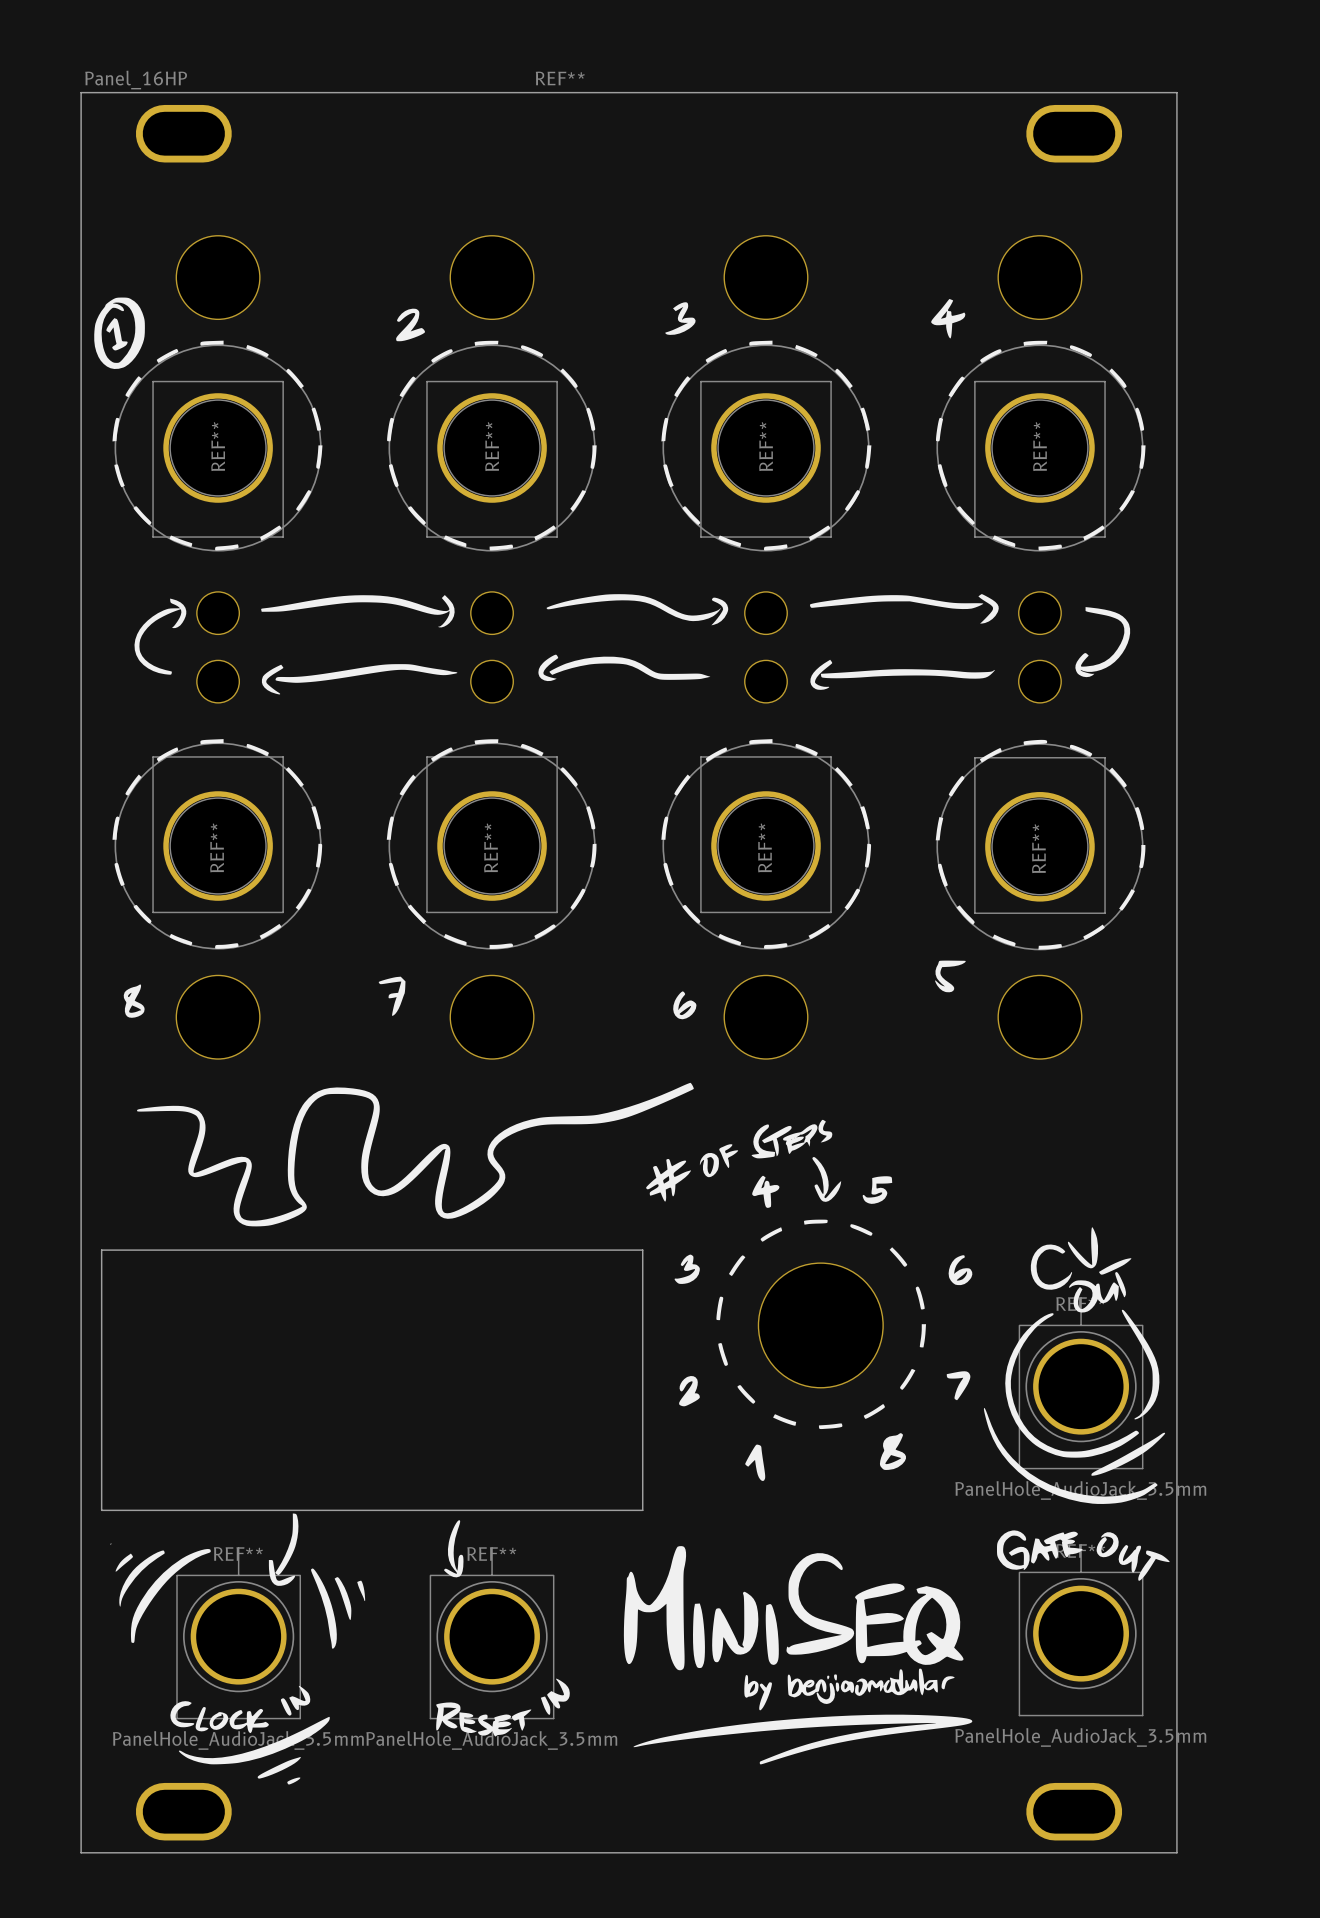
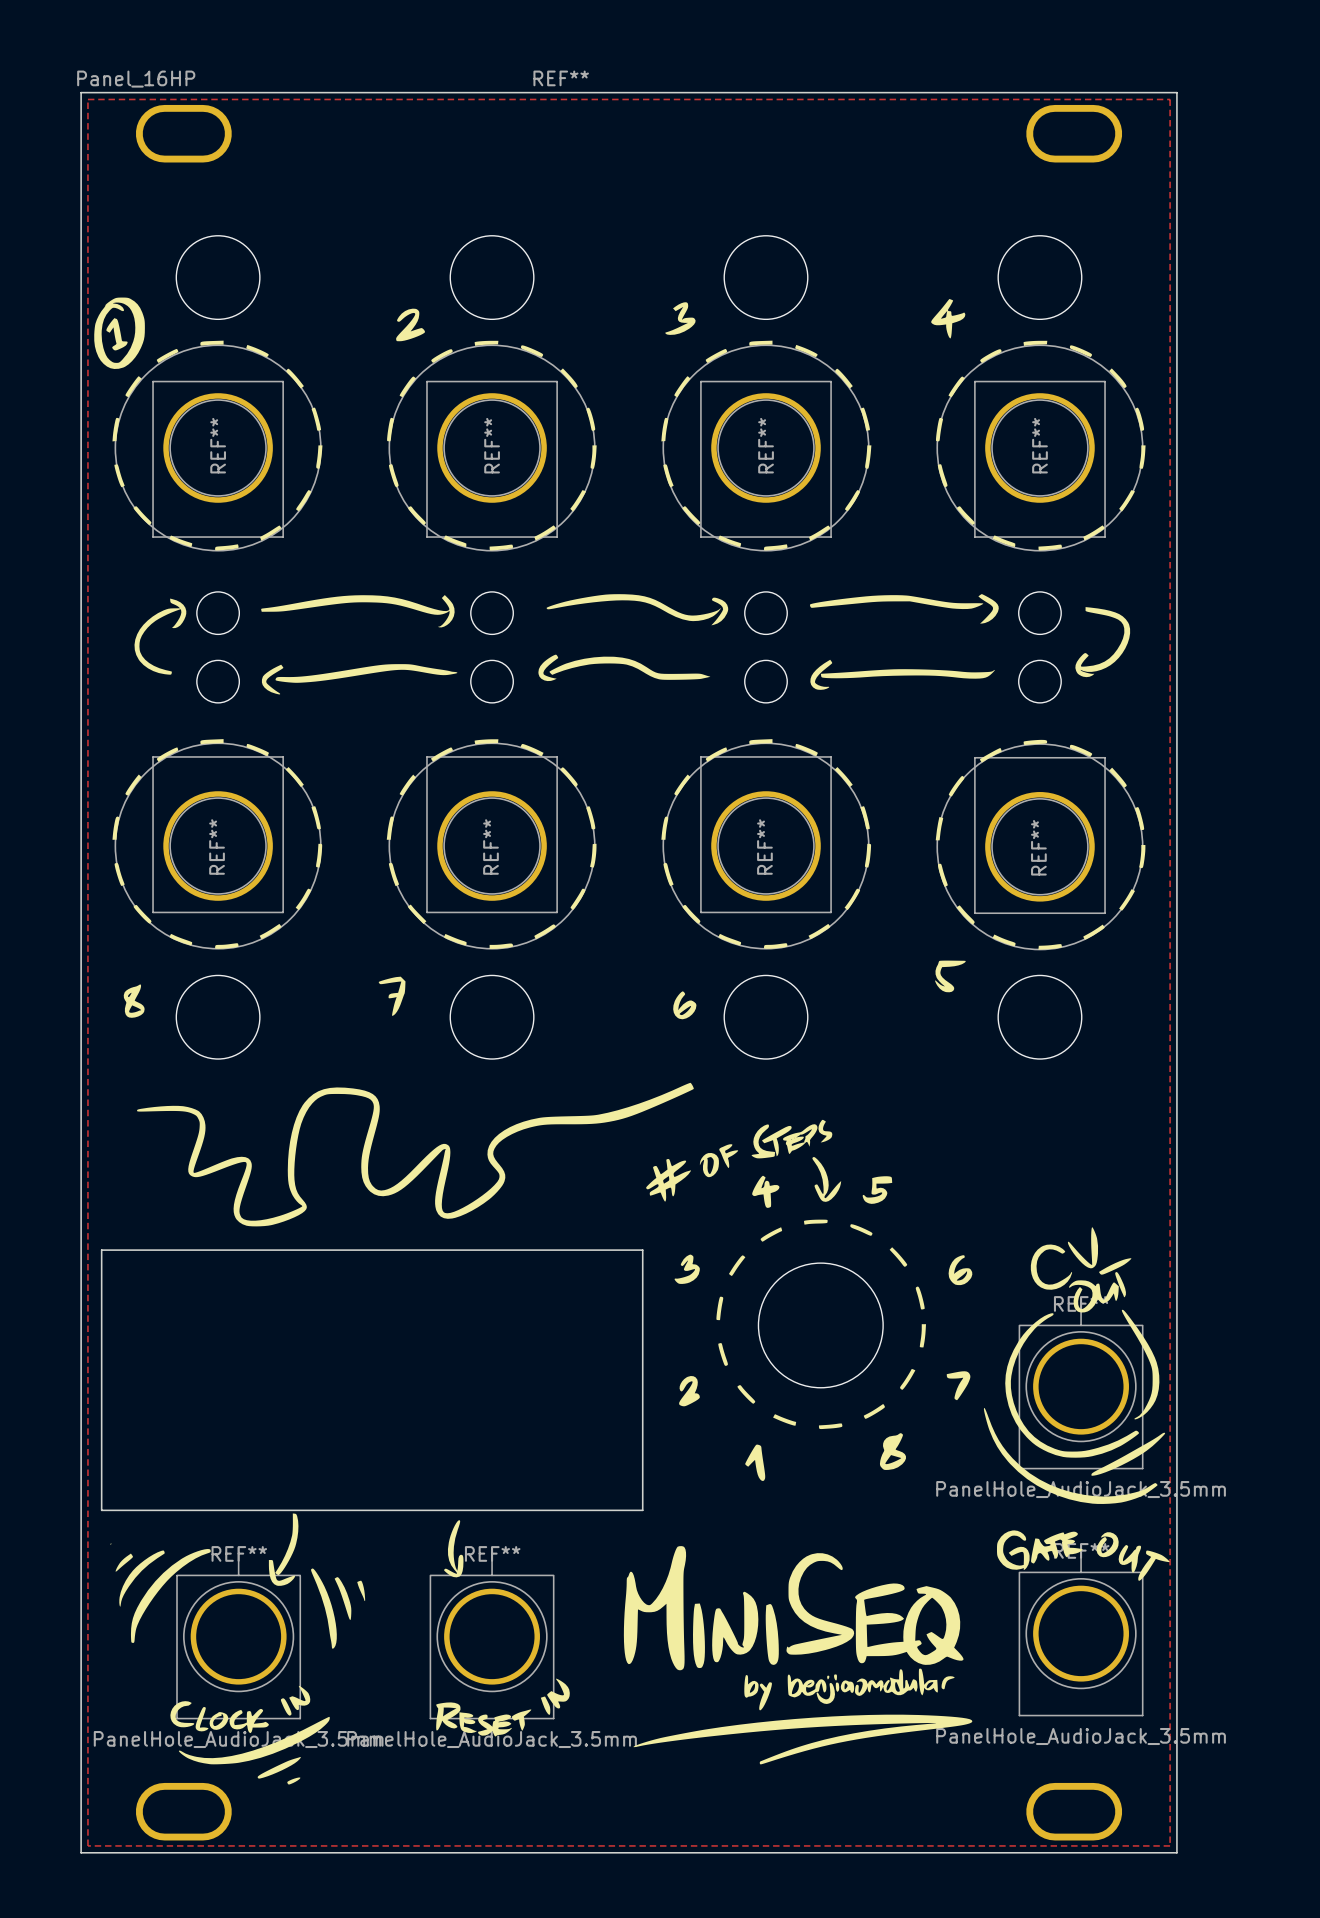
zone outline: none -> (87, 99) (1170, 99) (1170, 1845) (87, 1845) (87, 99)

